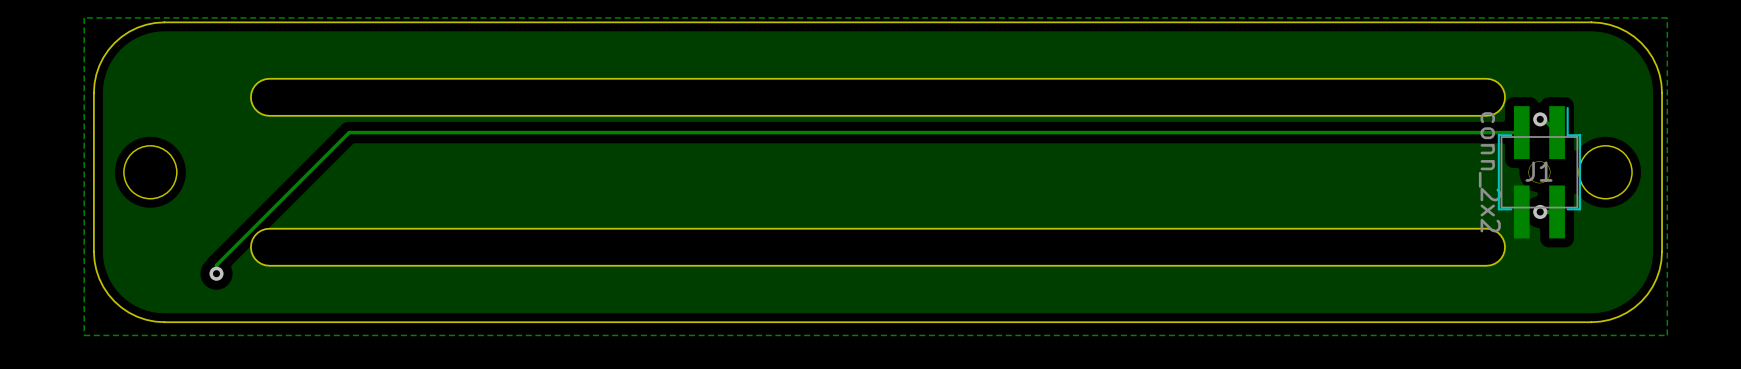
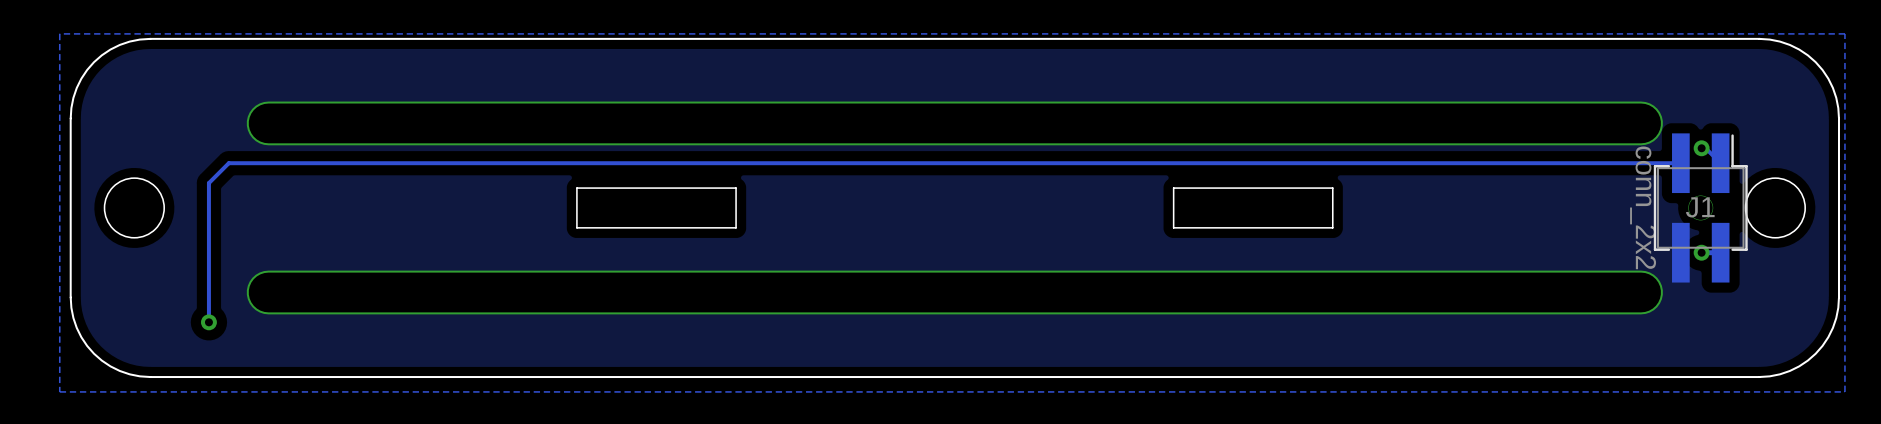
track: (349, 132) (216, 265) -> (358, 163) (228, 163) (208, 183) (208, 312)
board edge: none -> (736, 188) (576, 188) (576, 227) (736, 227) (736, 188)
board edge: none -> (1332, 188) (1173, 188) (1173, 227) (1332, 227) (1332, 188)

